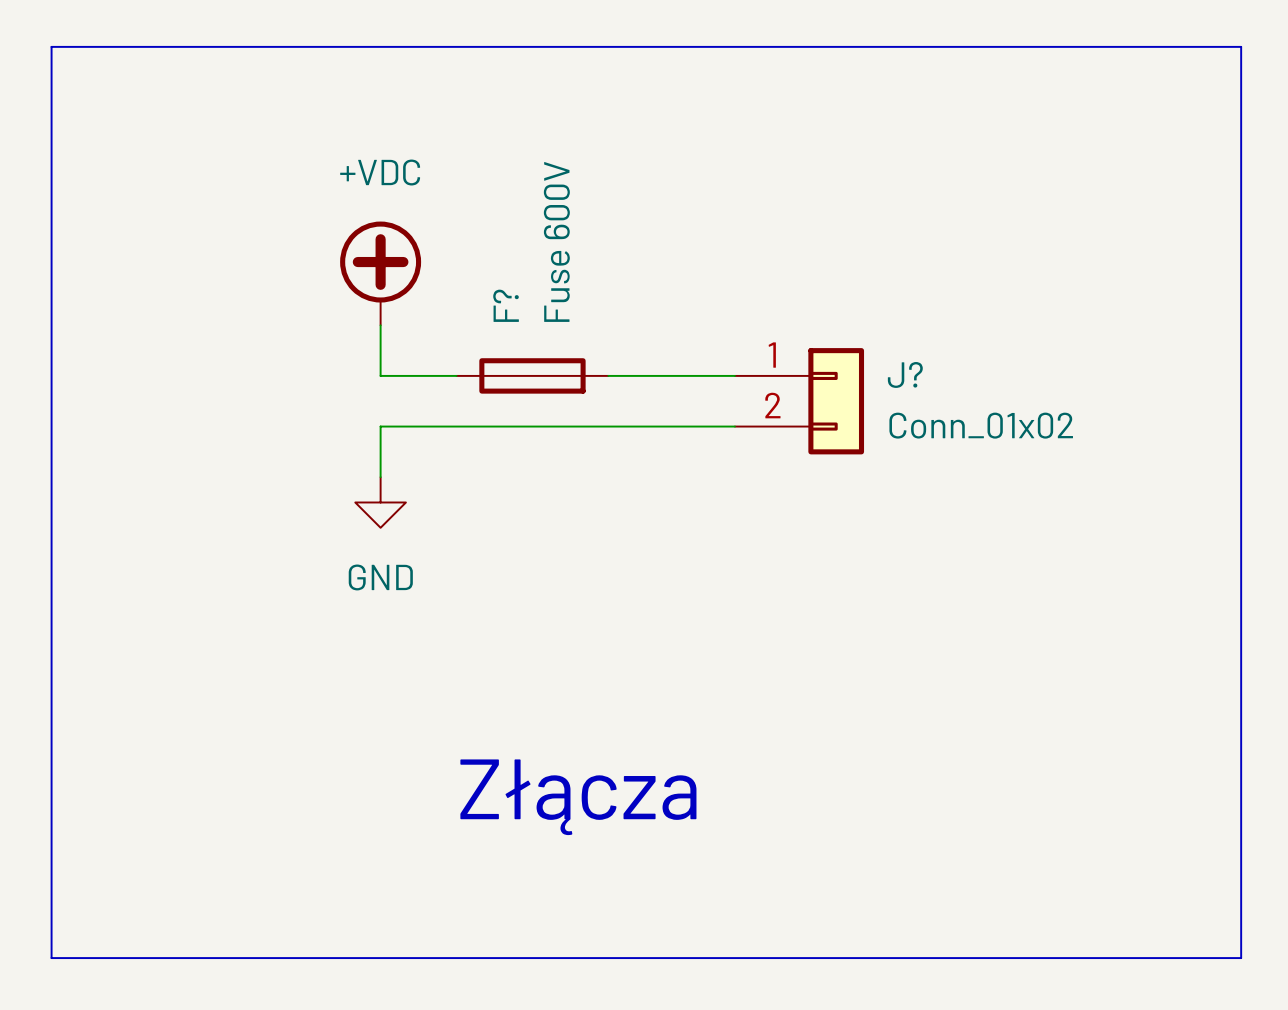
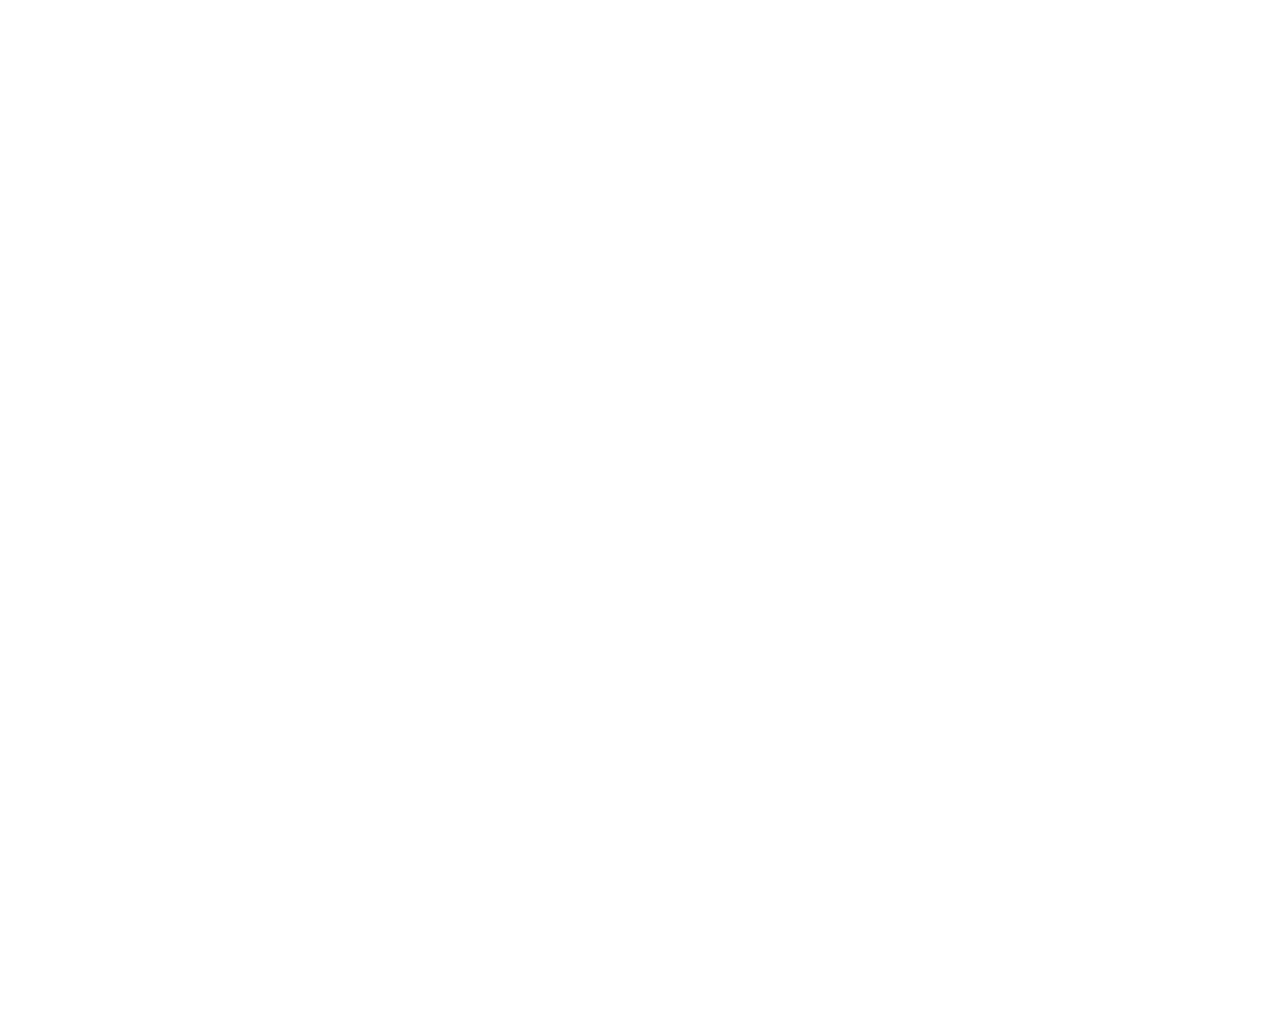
line: (51, 46) (1241, 46) (1241, 958) (51, 958) (51, 46) -> none
power symbol: +VDC (380, 273) -> none
wire: (380, 325) (380, 375) (456, 375) -> none
F?: Fuse 600V (532, 375) -> none
wire: (608, 375) (734, 375) -> none
J?: Conn_01x02 (799, 401) -> none
wire: (734, 426) (380, 426) (380, 477) -> none
power symbol: GND (380, 502) -> none
text: Złącza (578, 797) -> none

